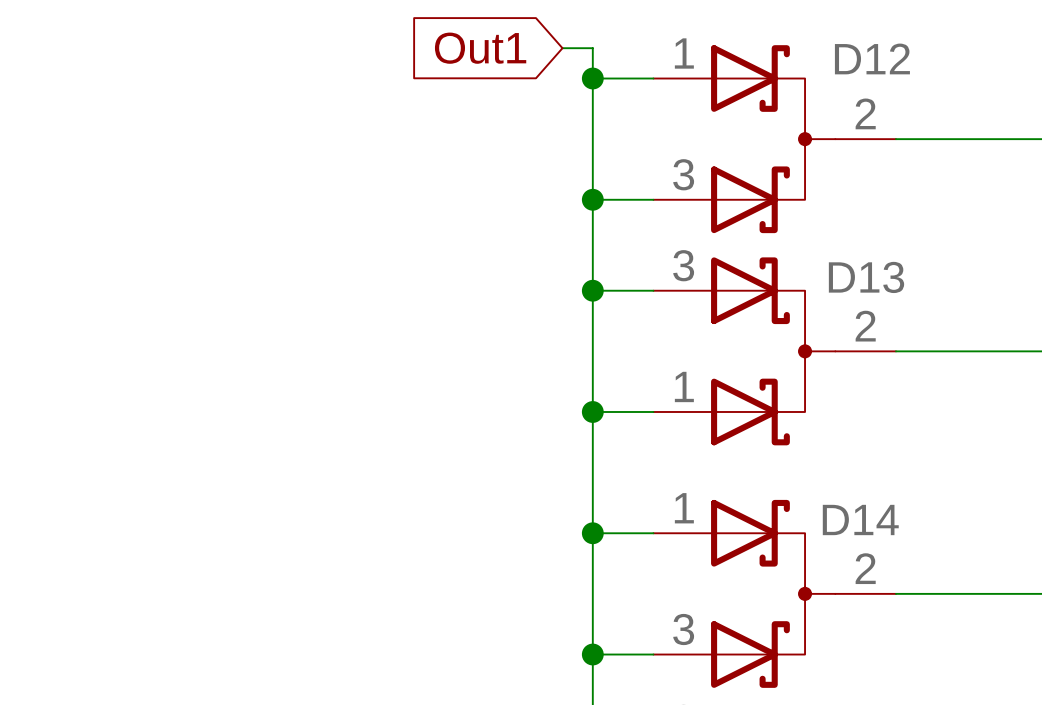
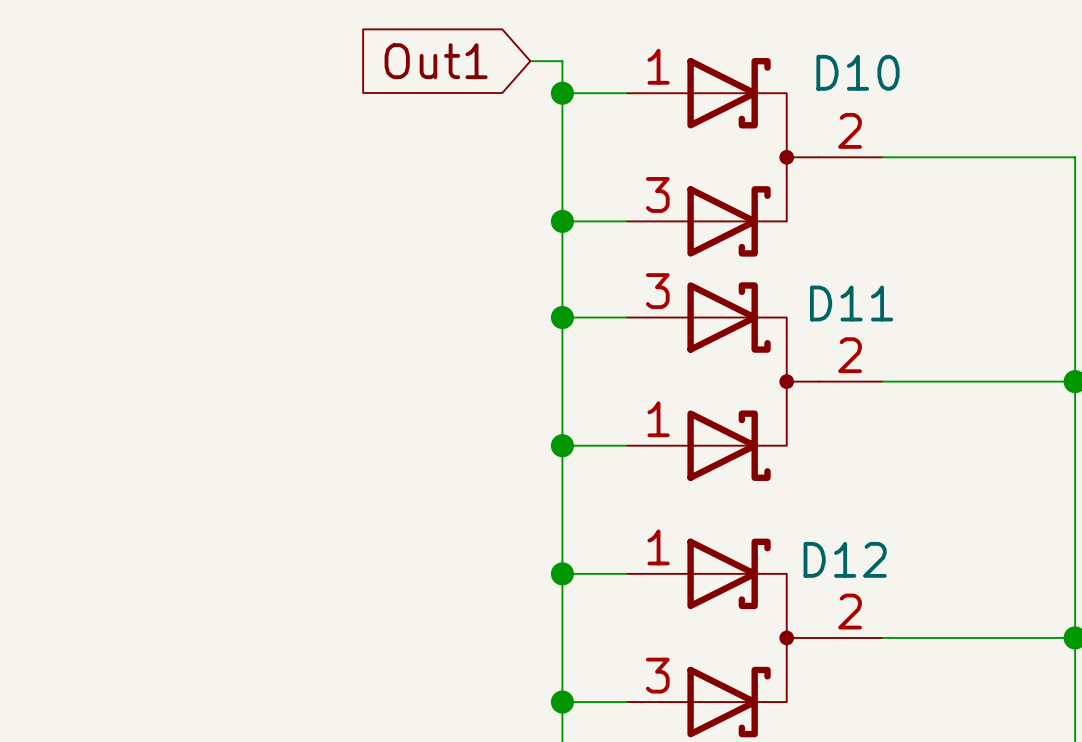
D12 name: D12 (872, 58) -> D10 (857, 72)
D13 name: D13 (866, 277) -> D11 (851, 303)
D14 name: D14 (860, 519) -> D12 (845, 559)

